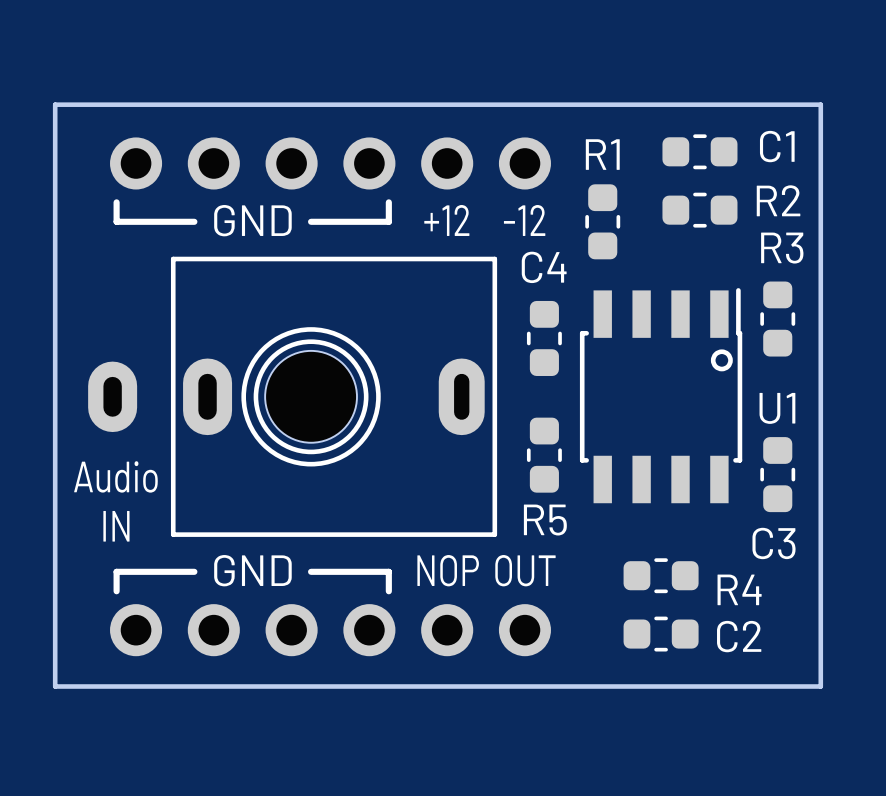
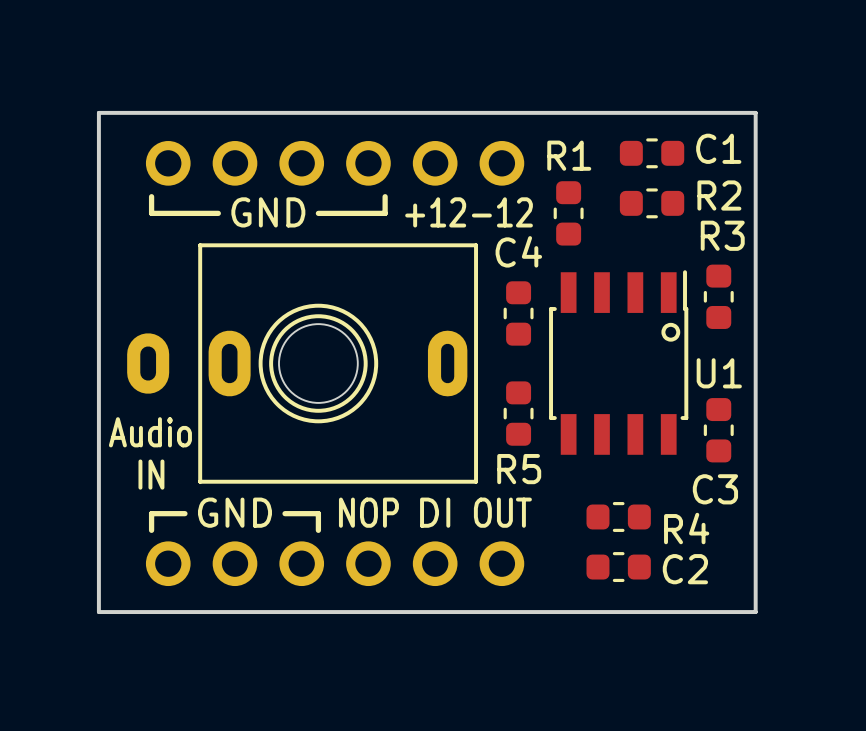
text position: GND (252, 570) -> GND (234, 512)
text: none -> NOP (368, 512)
text: NOP (448, 570) -> DI (435, 512)
line: (155, 571) (194, 571) -> none
line: none -> (285, 513) (318, 513) (318, 530)
line: (311, 571) (388, 571) (388, 591) -> none

